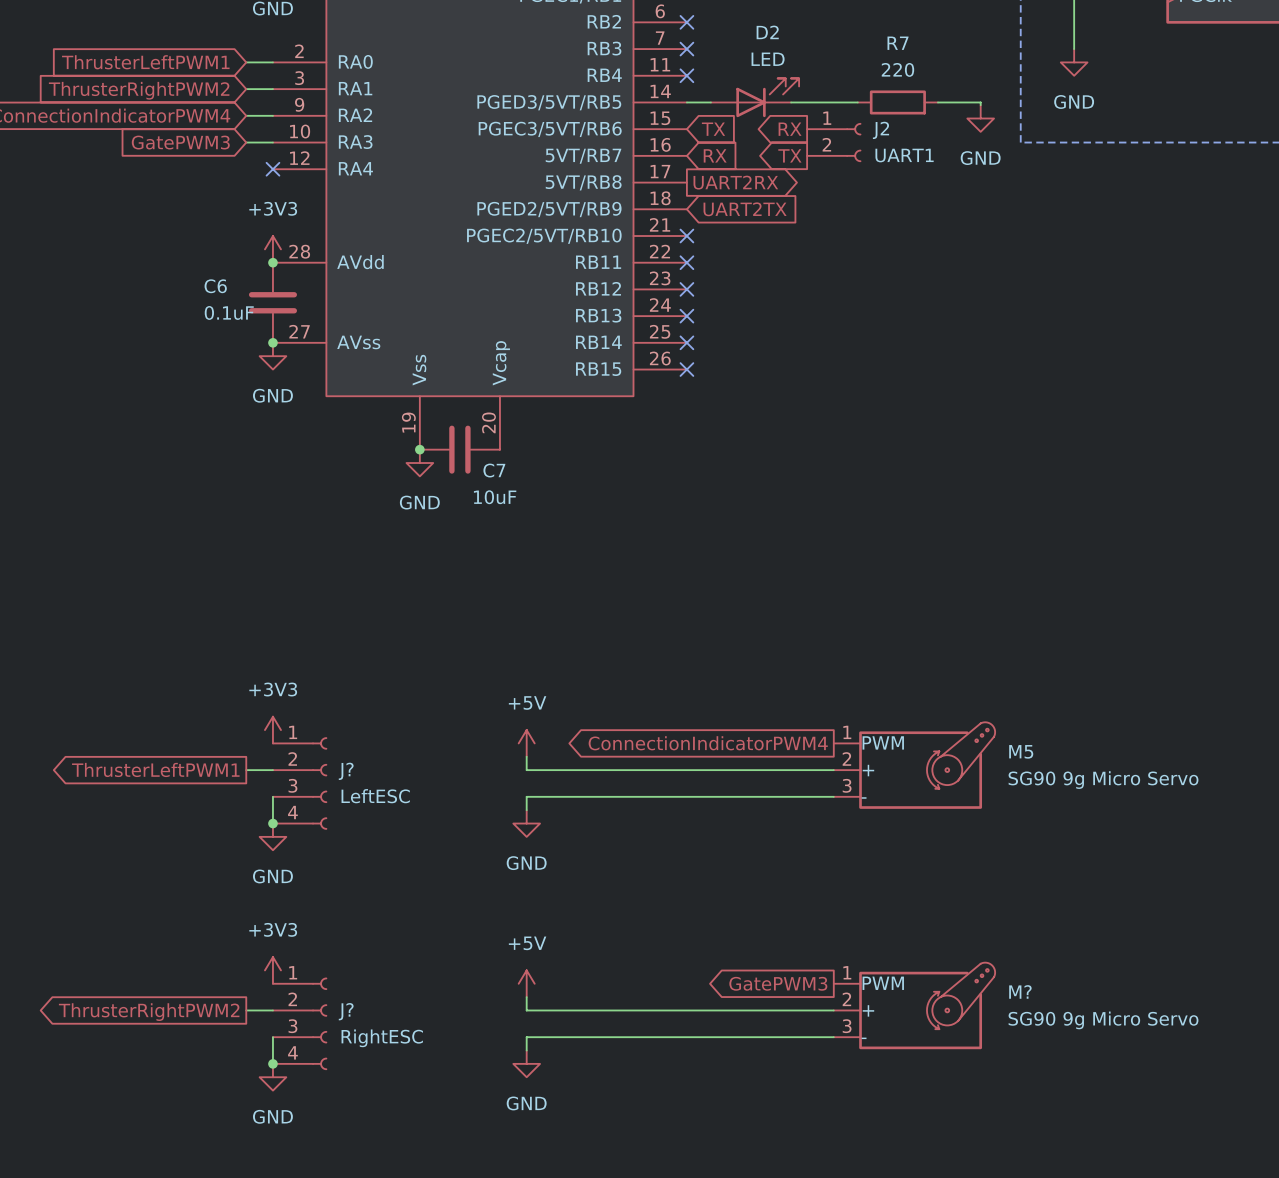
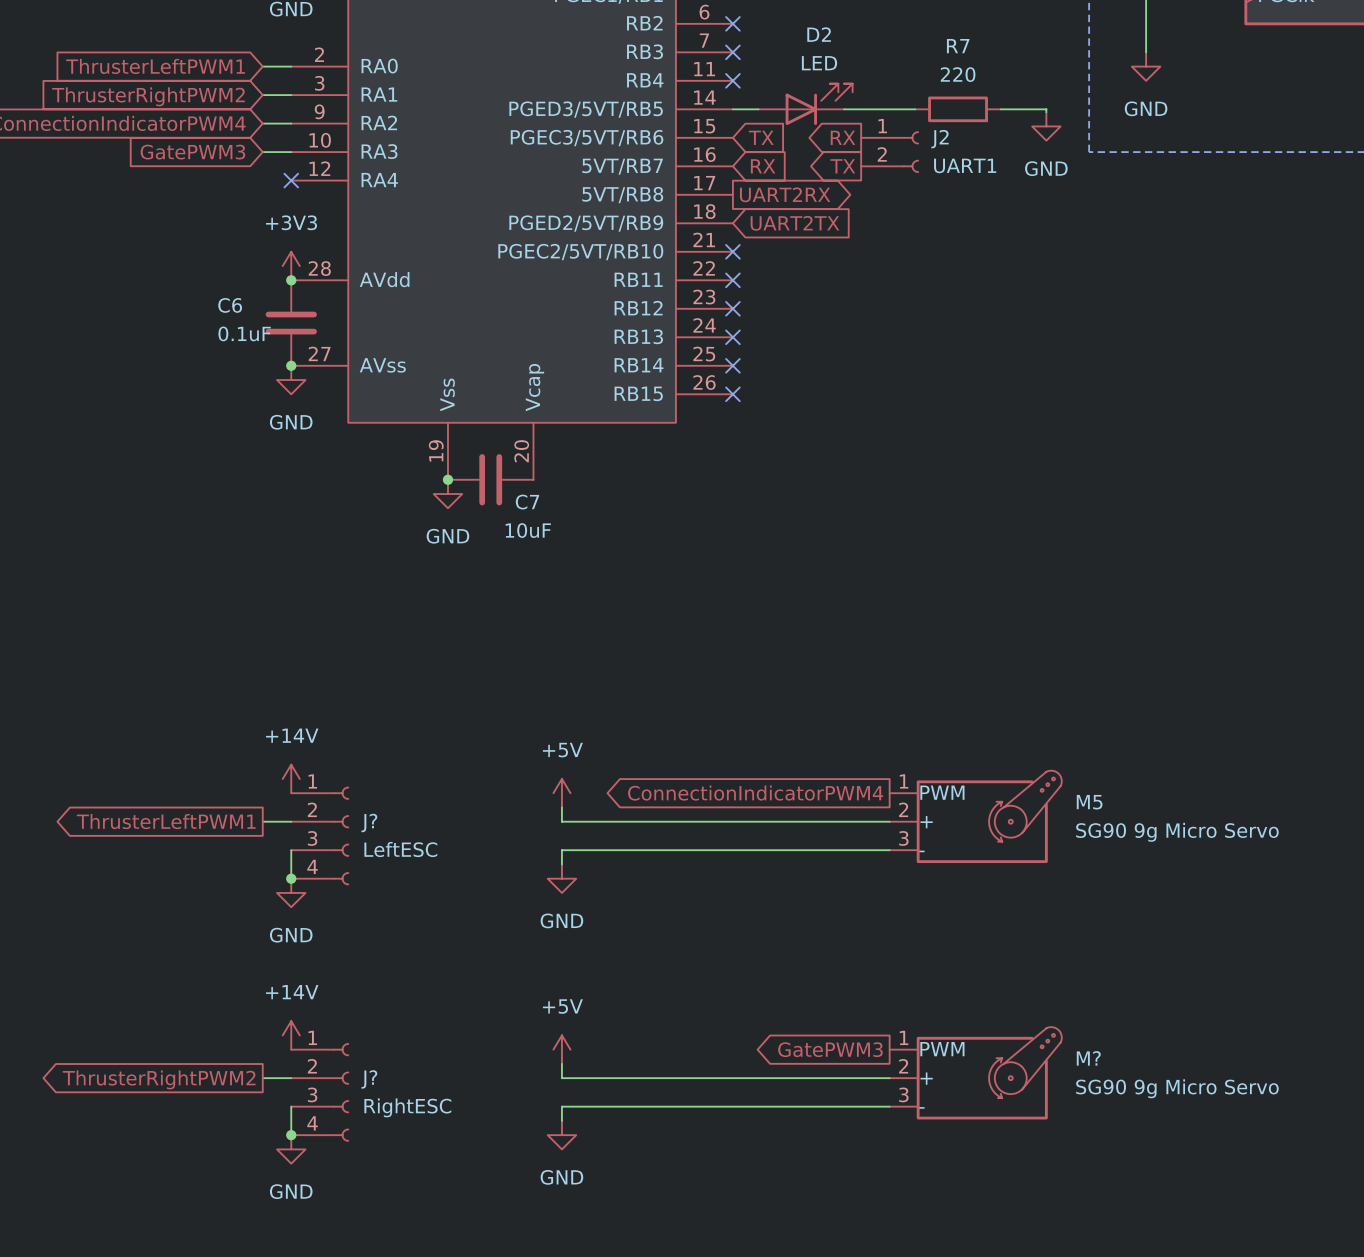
power symbol: +3V3 (272, 730) -> +14V (291, 778)
power symbol: +3V3 (272, 970) -> +14V (291, 1035)

